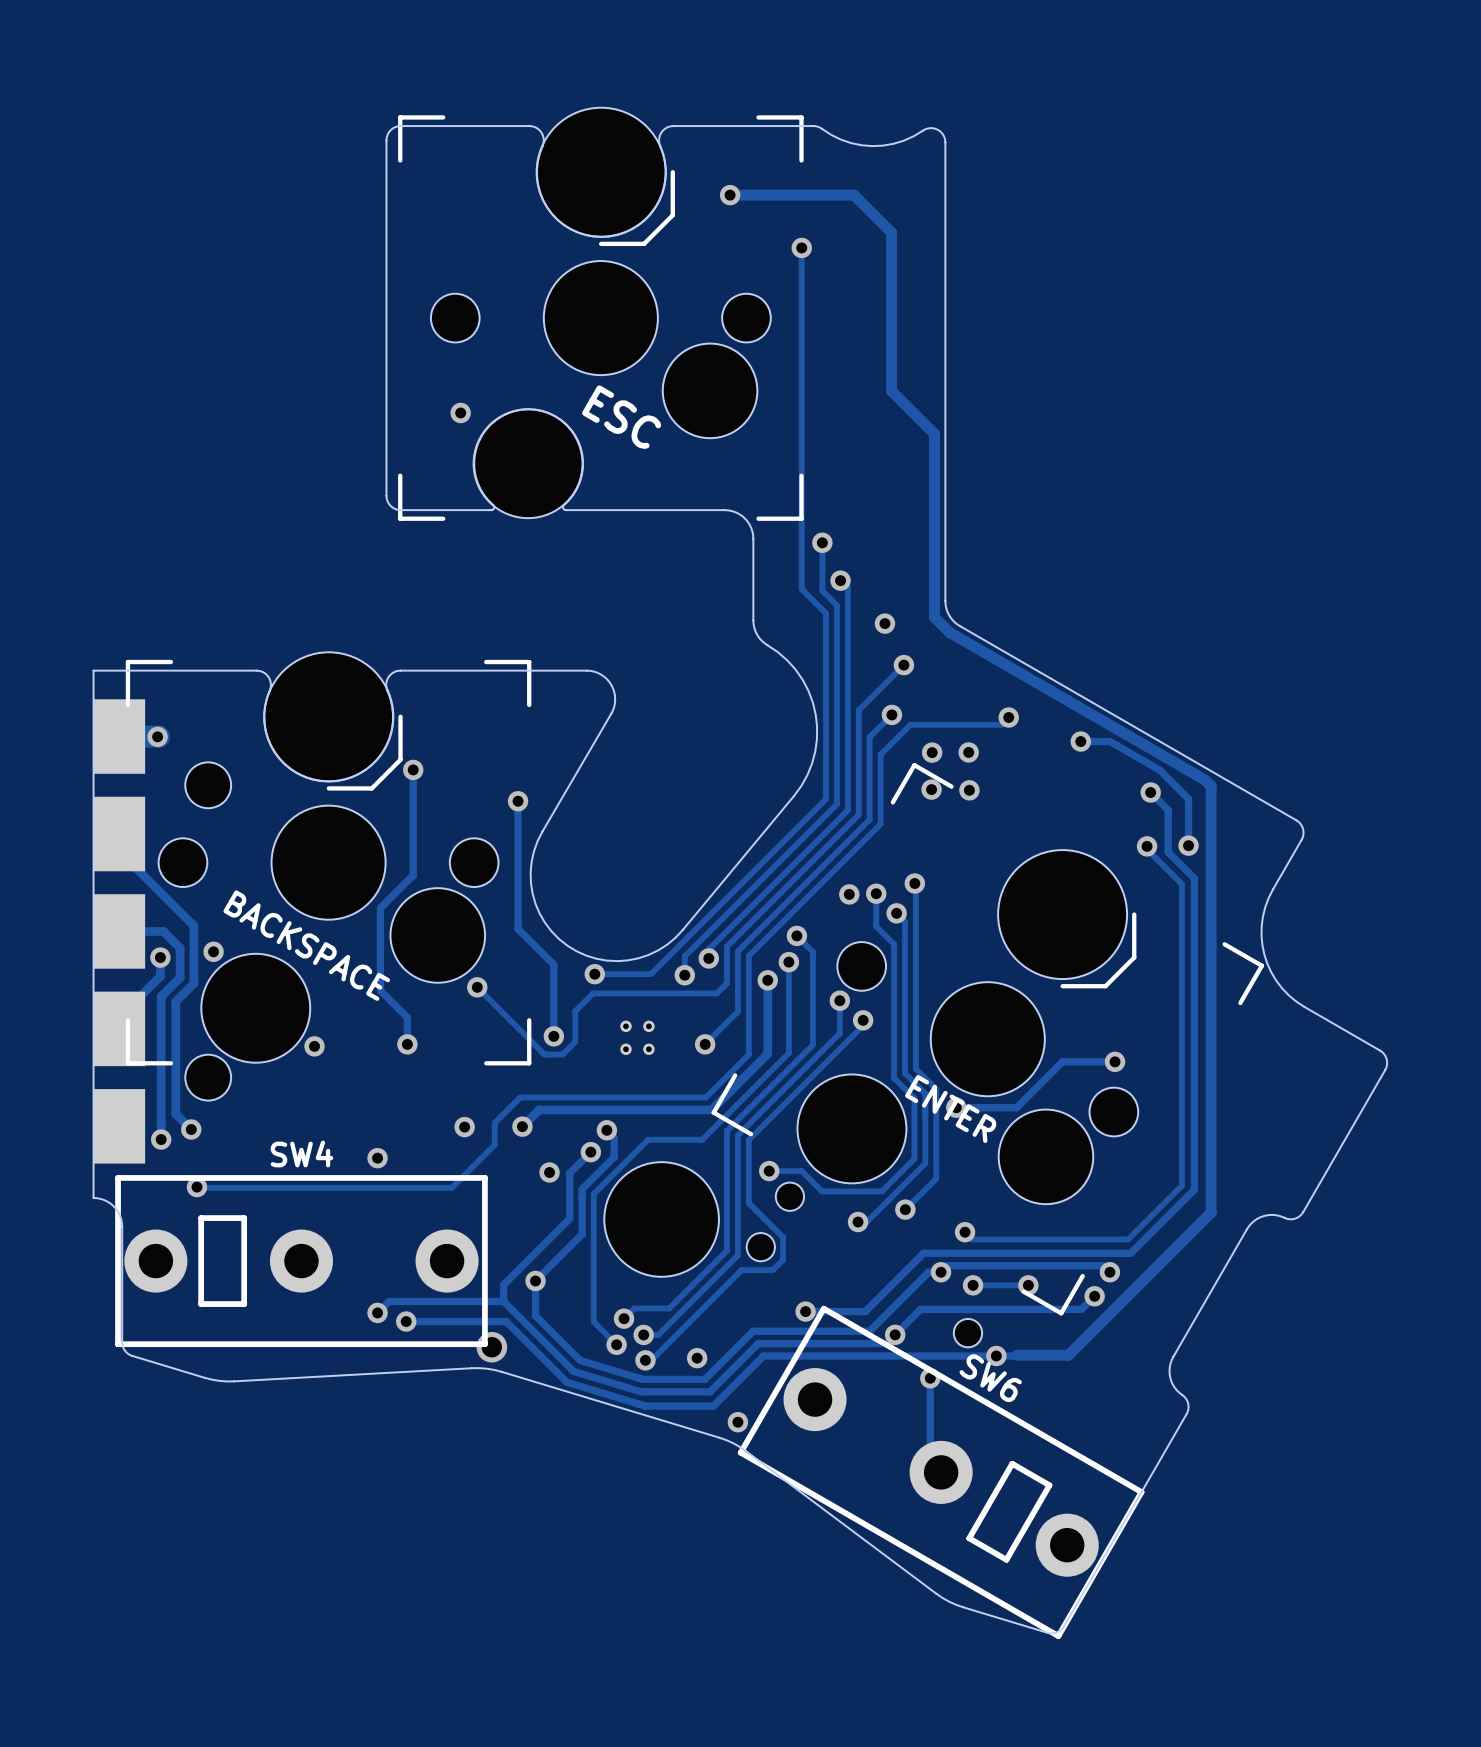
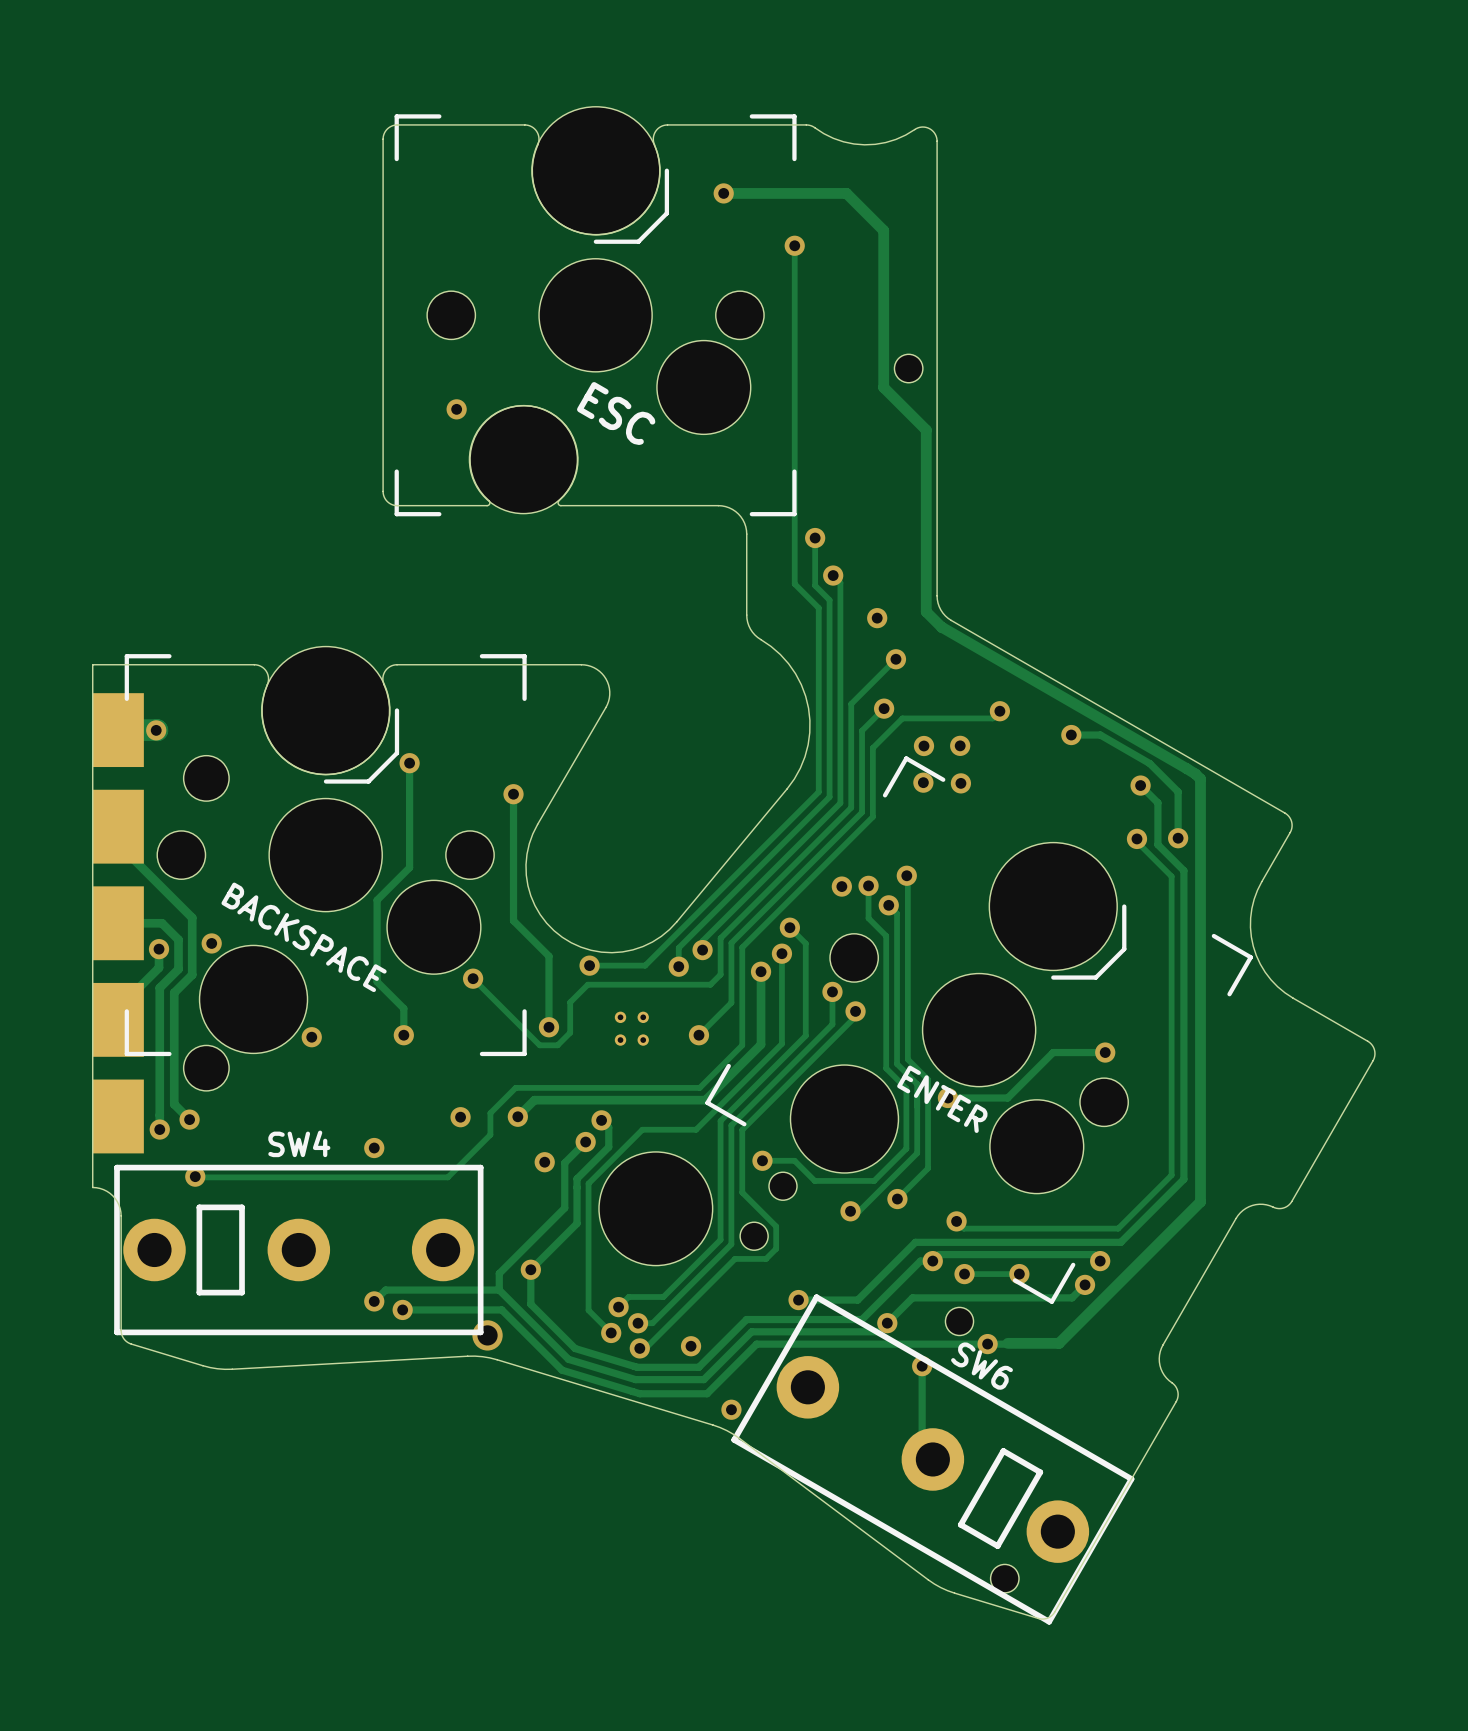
part: none -> (908, 368)
part: none -> (1004, 1578)

